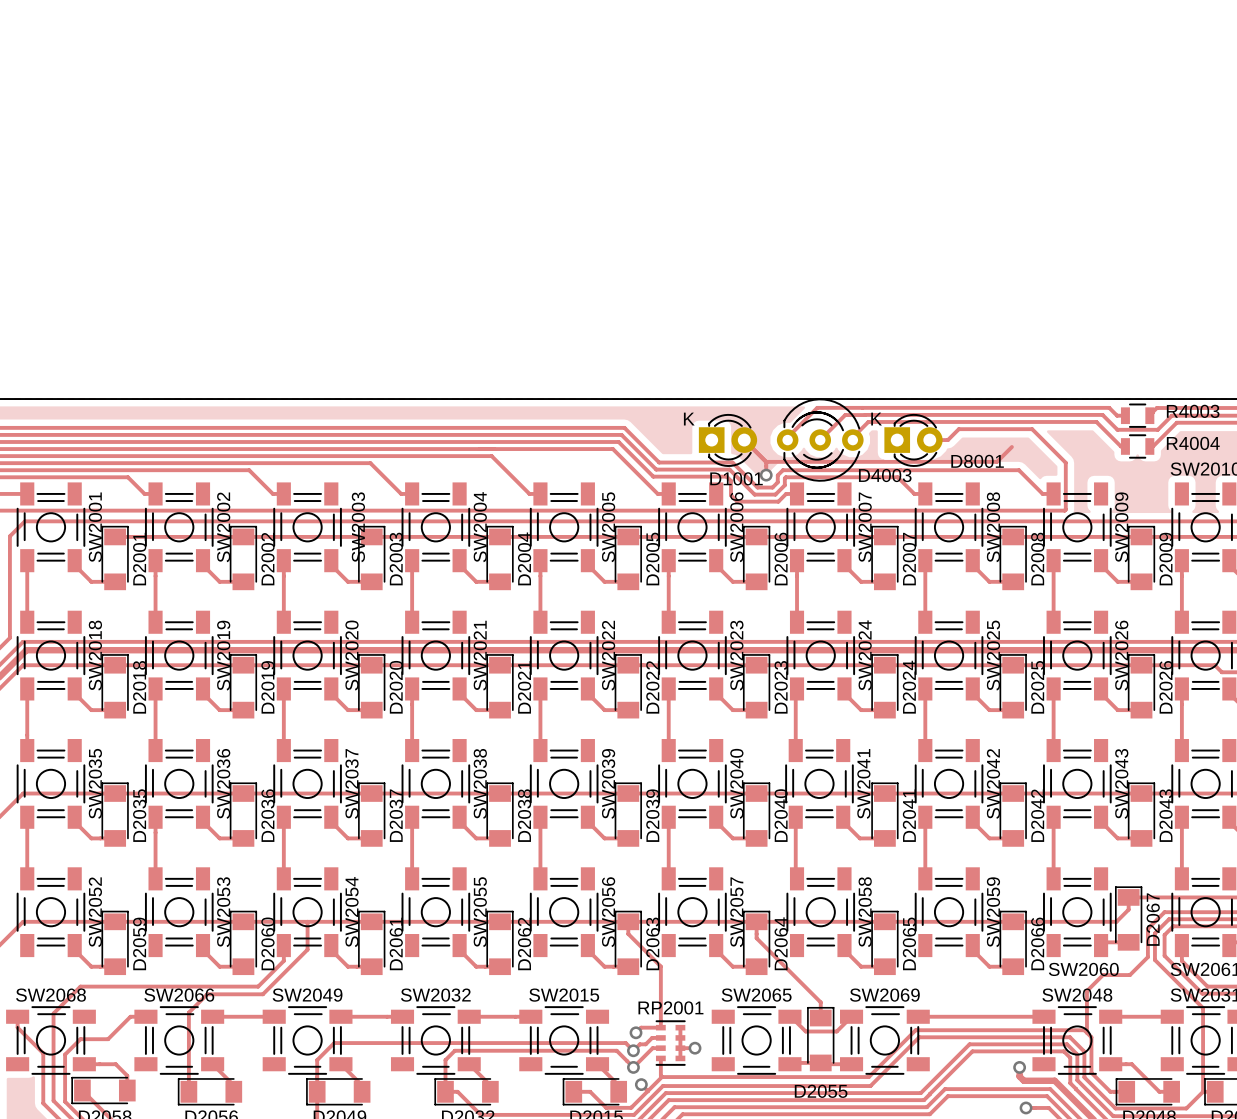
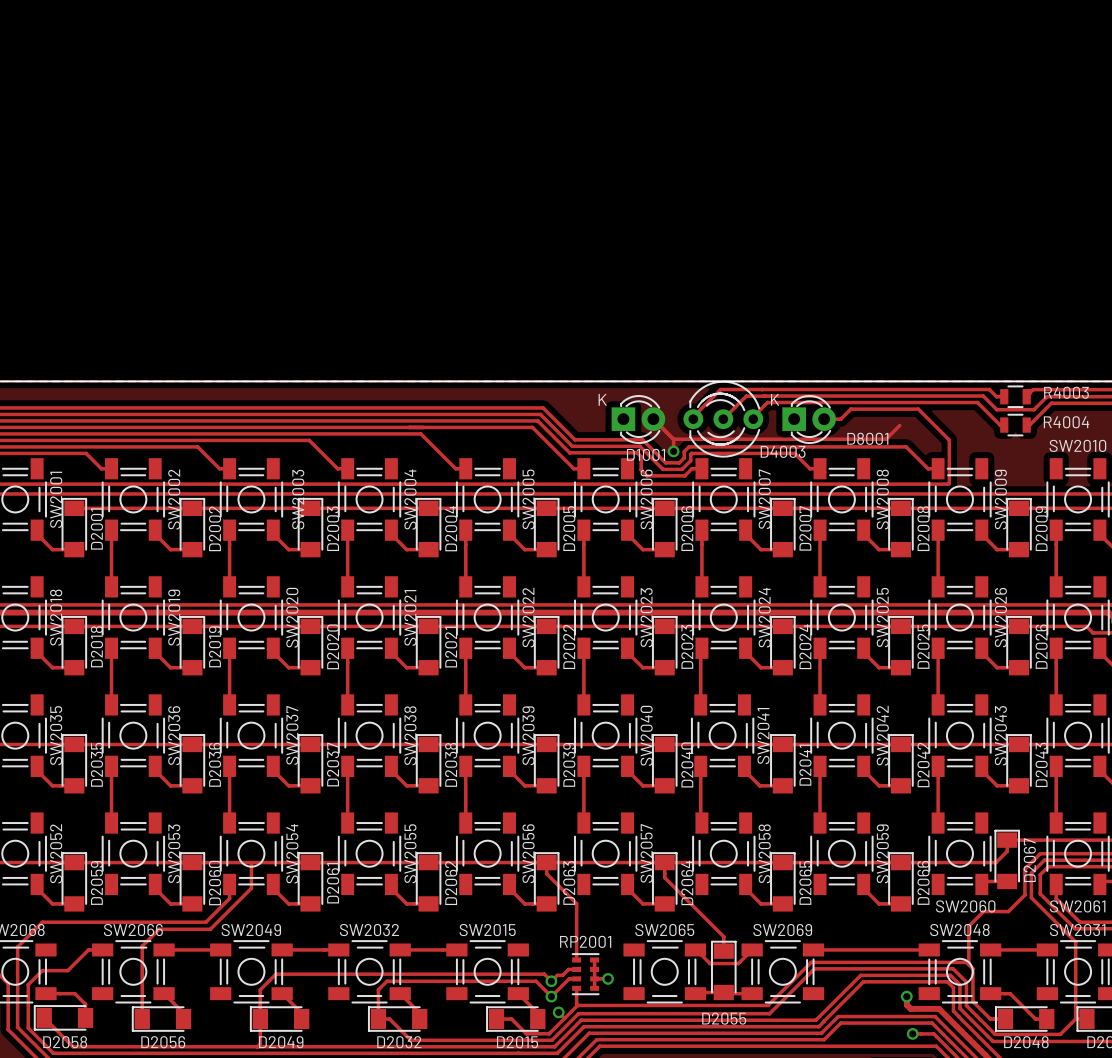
track: (660, 1027) (641, 1027) (636, 1032) -> none
via: (636, 1032) -> none

